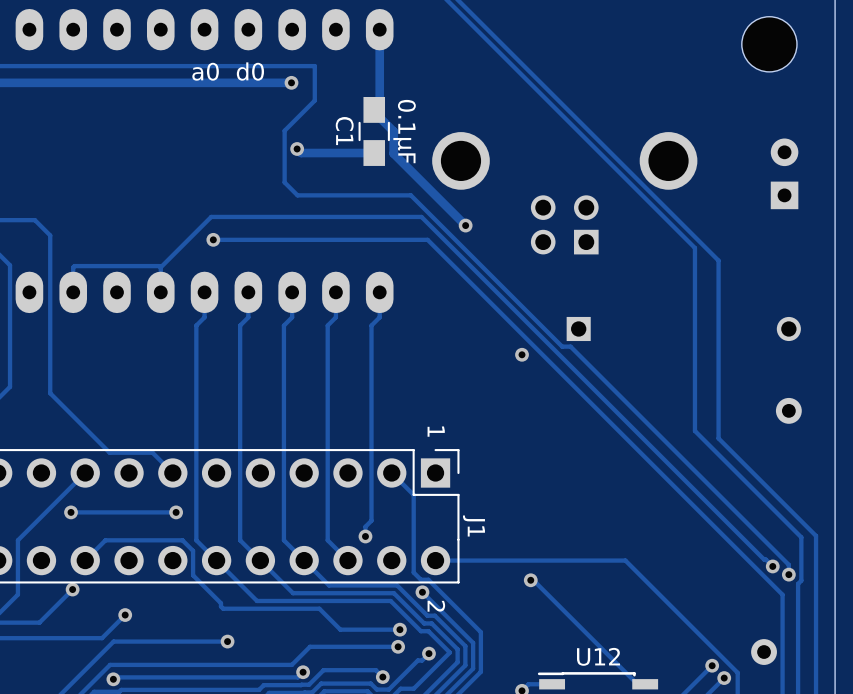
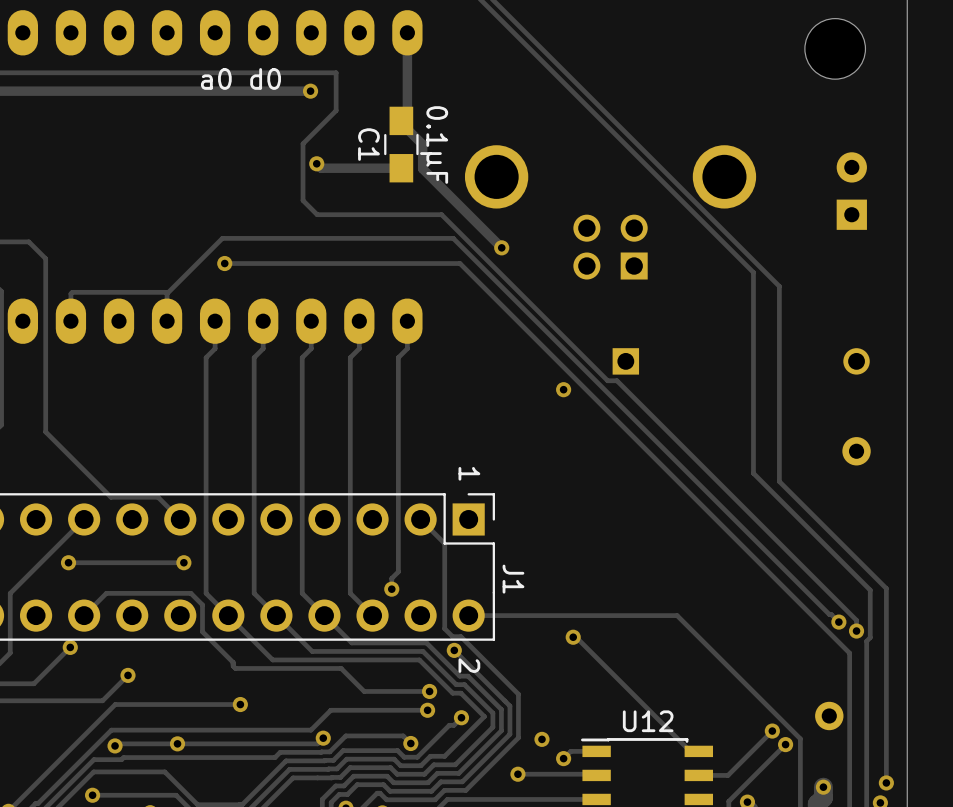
via: none -> (541, 739)
via: none -> (177, 743)

